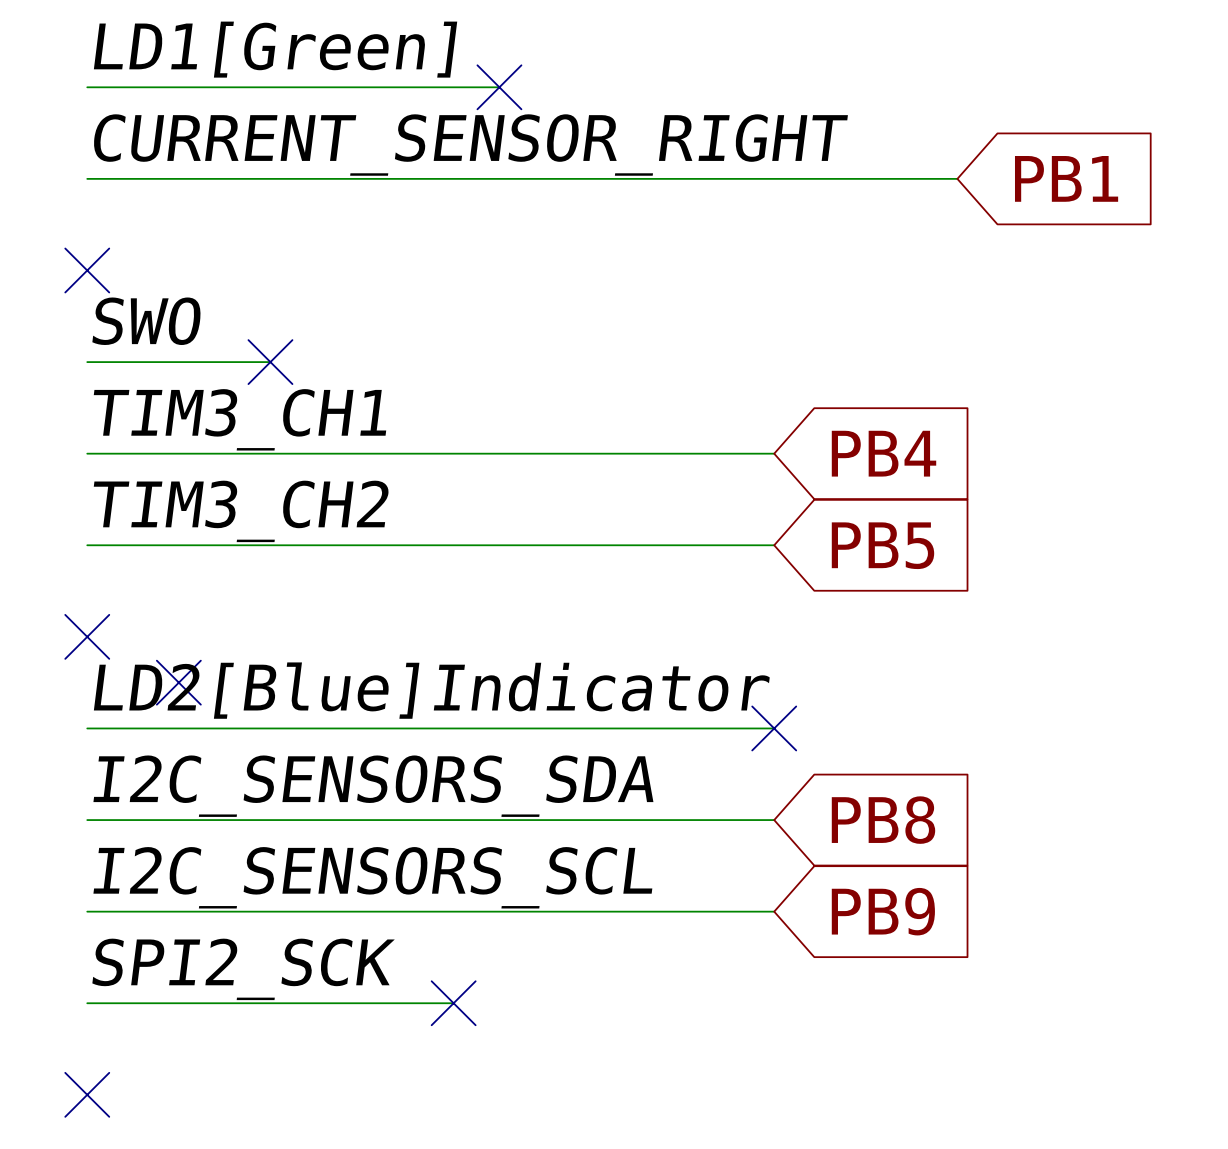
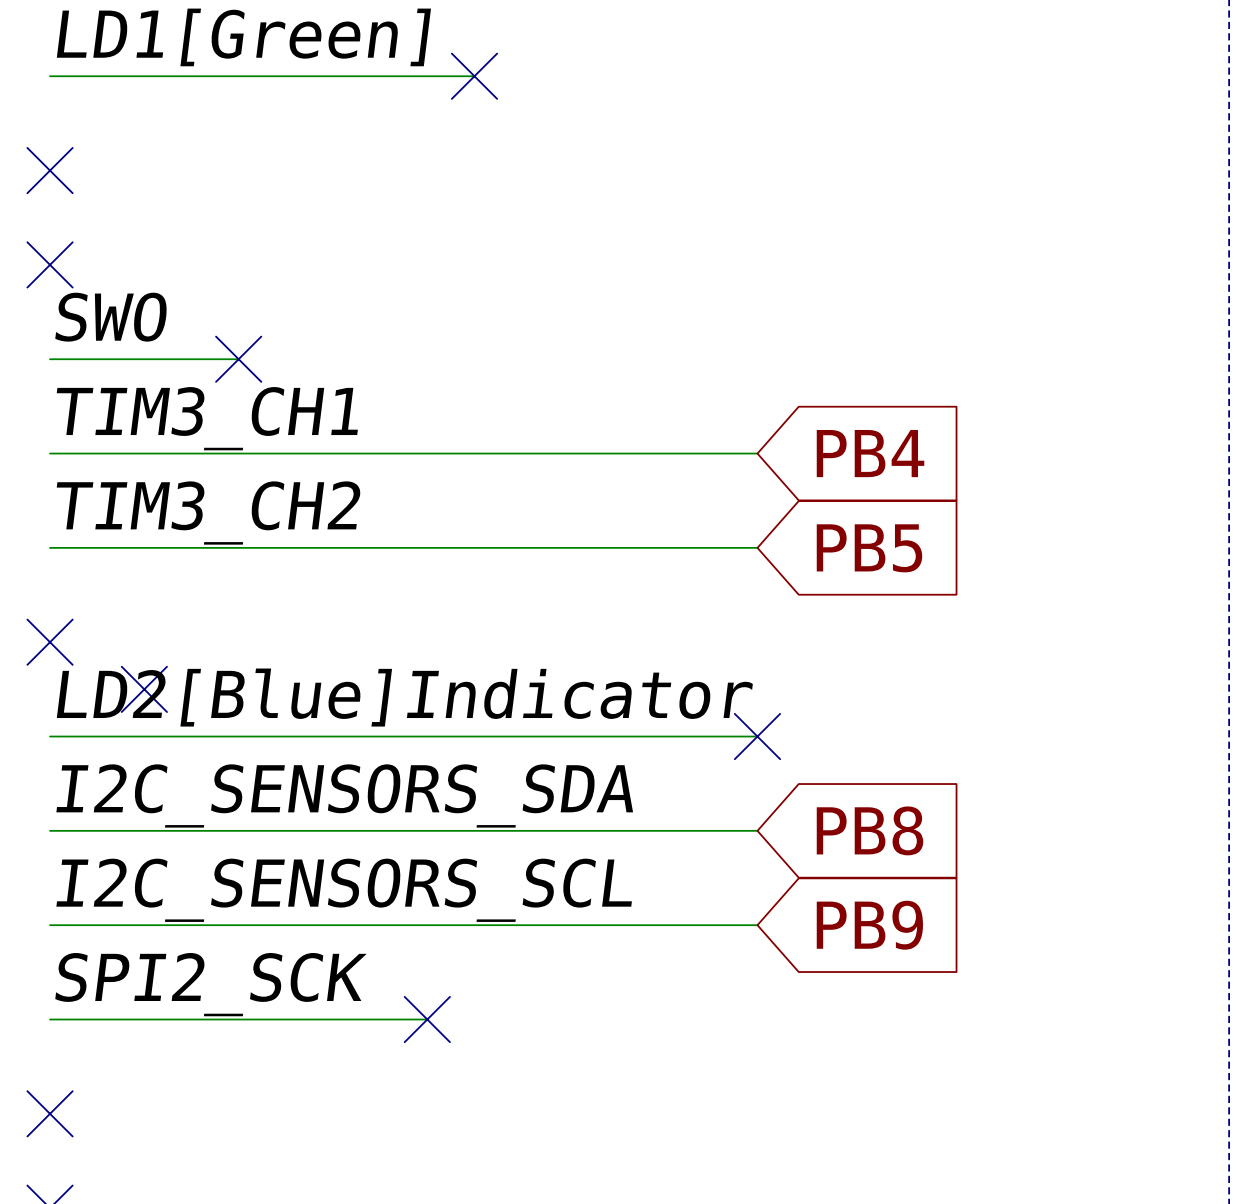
label: CURRENT_SENSOR_RIGHT (470, 145) -> none
wire: (87, 178) (957, 178) -> none
no-connect mark: none -> (50, 170)
global label: PB1 (1066, 178) -> none

